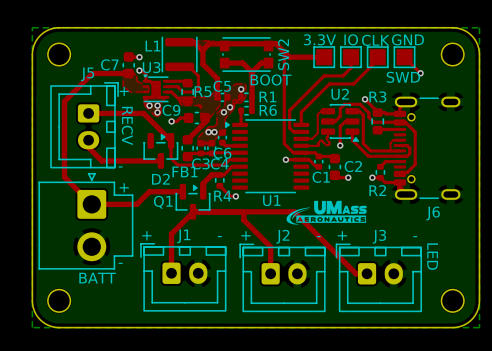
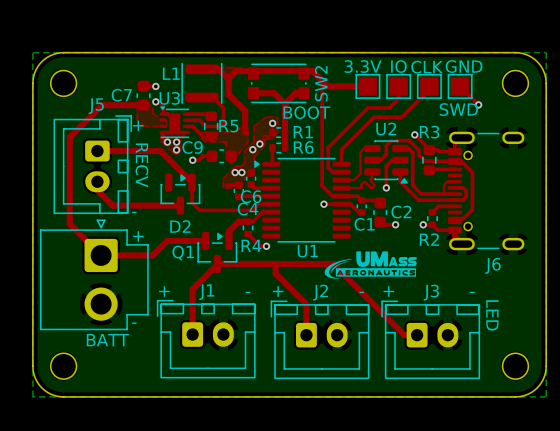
C5: (222, 97) -> none
top track: (205, 122) (187, 139) -> none
FB1: (187, 148) -> none
C3: (201, 148) -> none
top track: (211, 153) (190, 153) (187, 156) -> none

